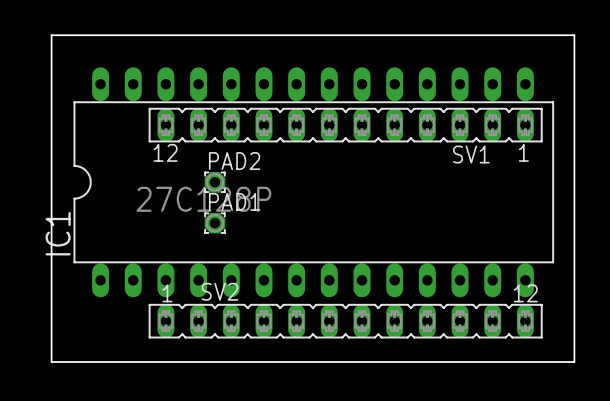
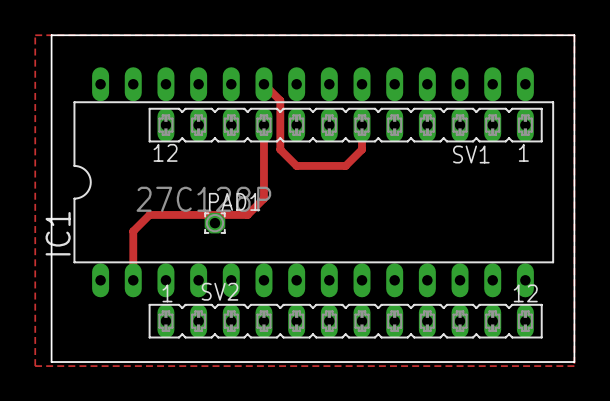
zone outline: none -> (35, 35) (574, 35) (574, 366) (35, 366) (35, 35)
track: none -> (263, 84) (280, 100) (280, 149) (296, 165) (345, 165) (362, 149) (362, 125)
track: none -> (263, 125) (263, 198) (247, 214) (149, 214) (133, 231) (133, 280)
PAD2: (214, 182) -> none

